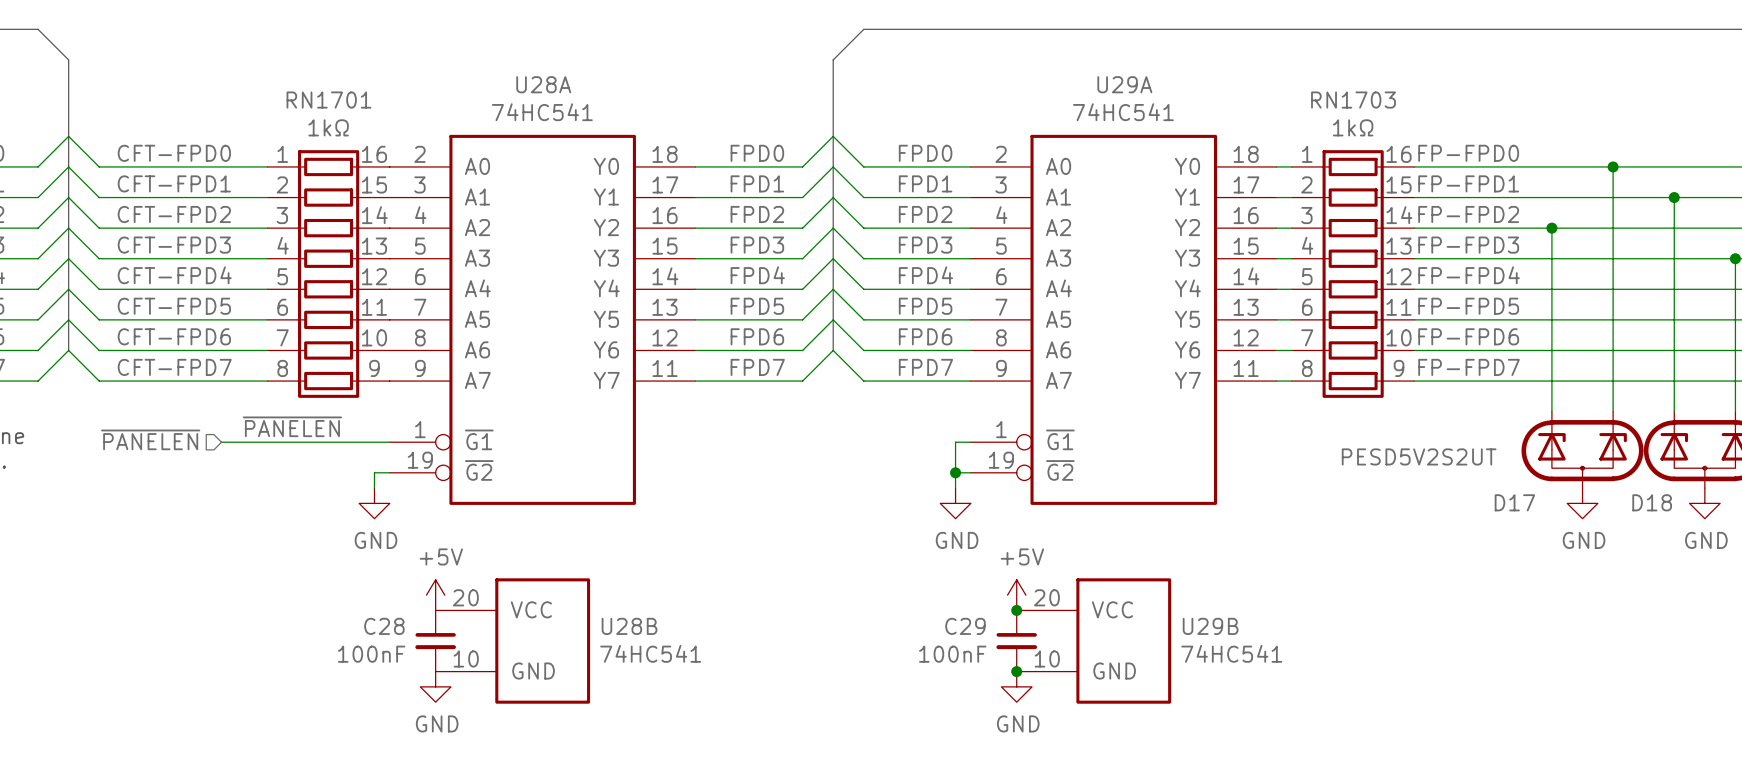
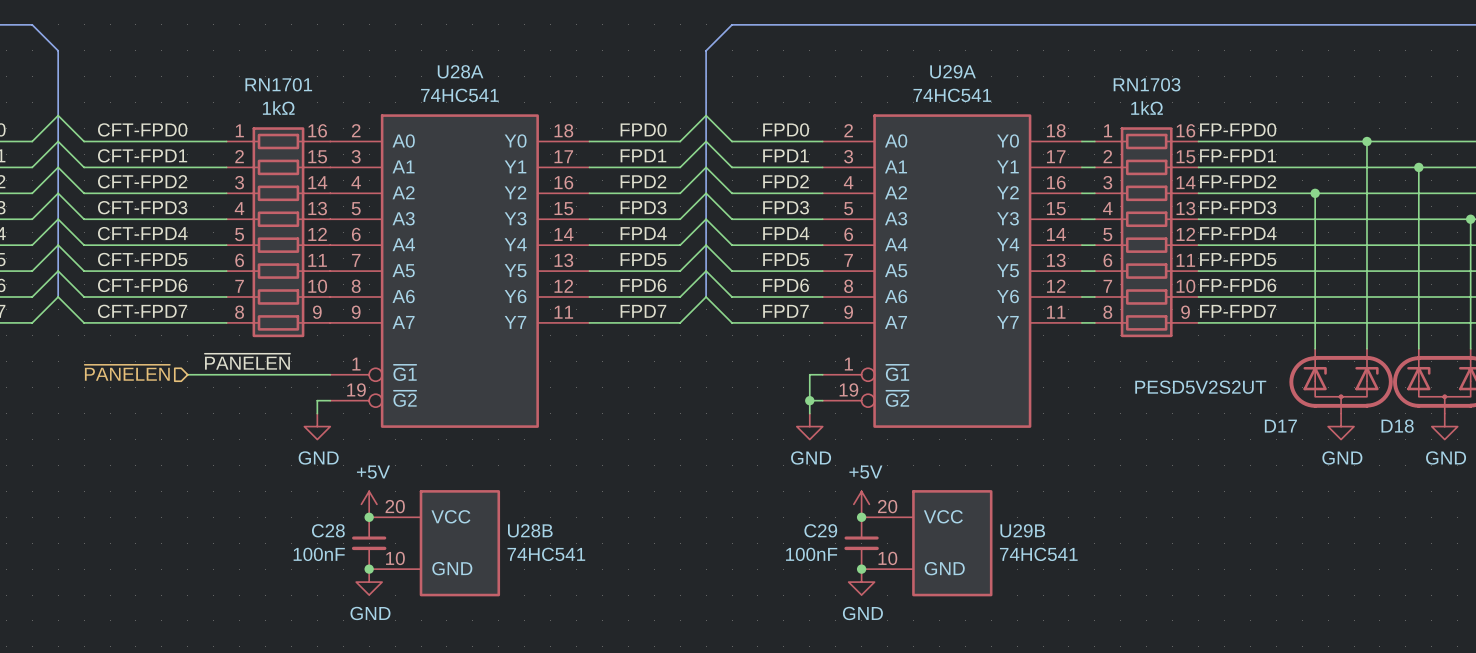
junction: none -> (369, 517)
junction: none -> (369, 569)

